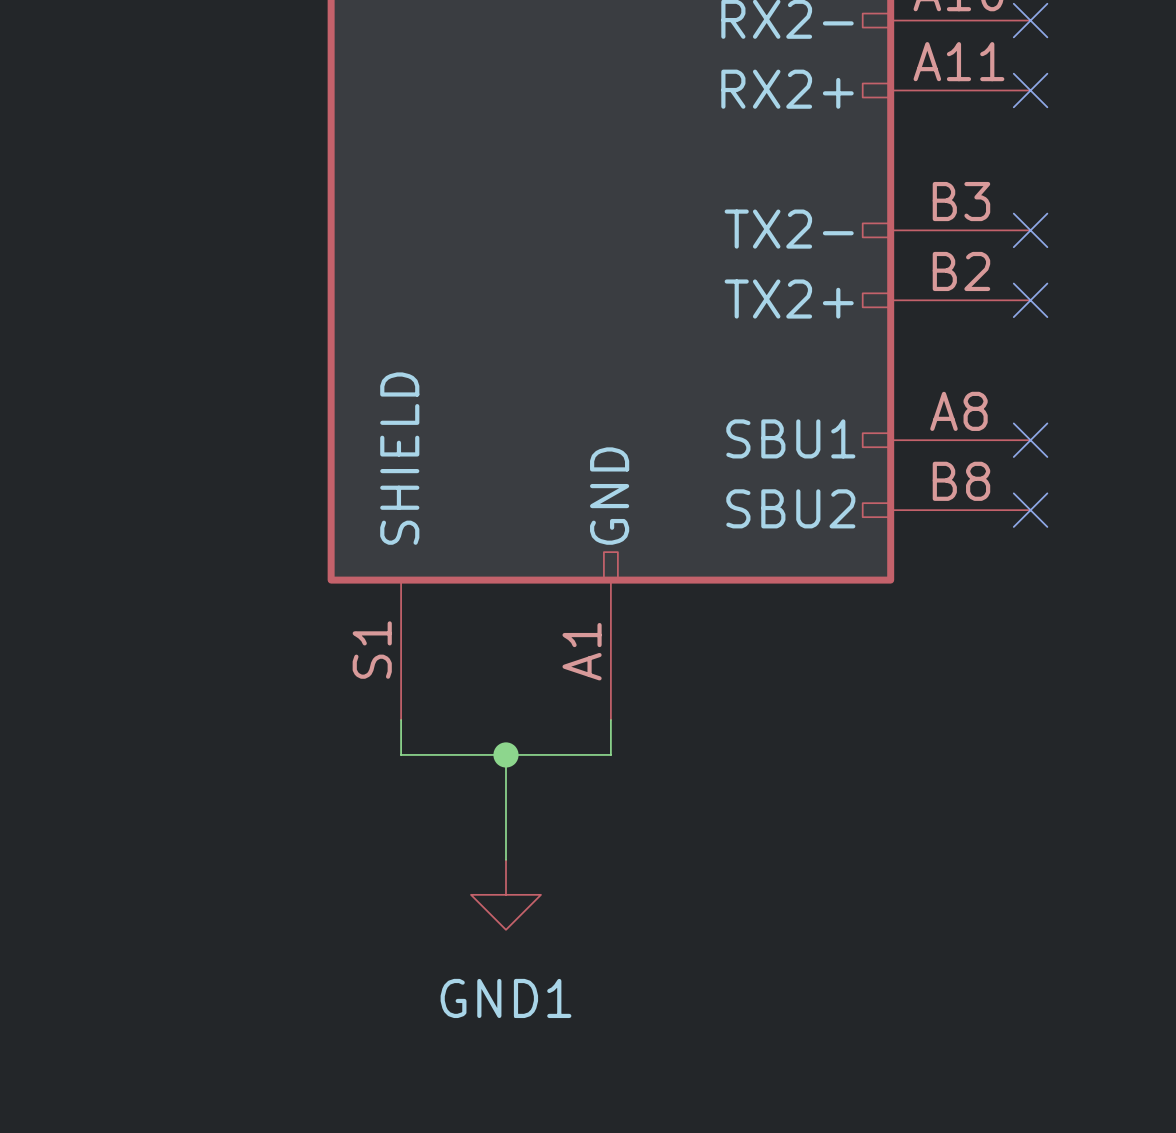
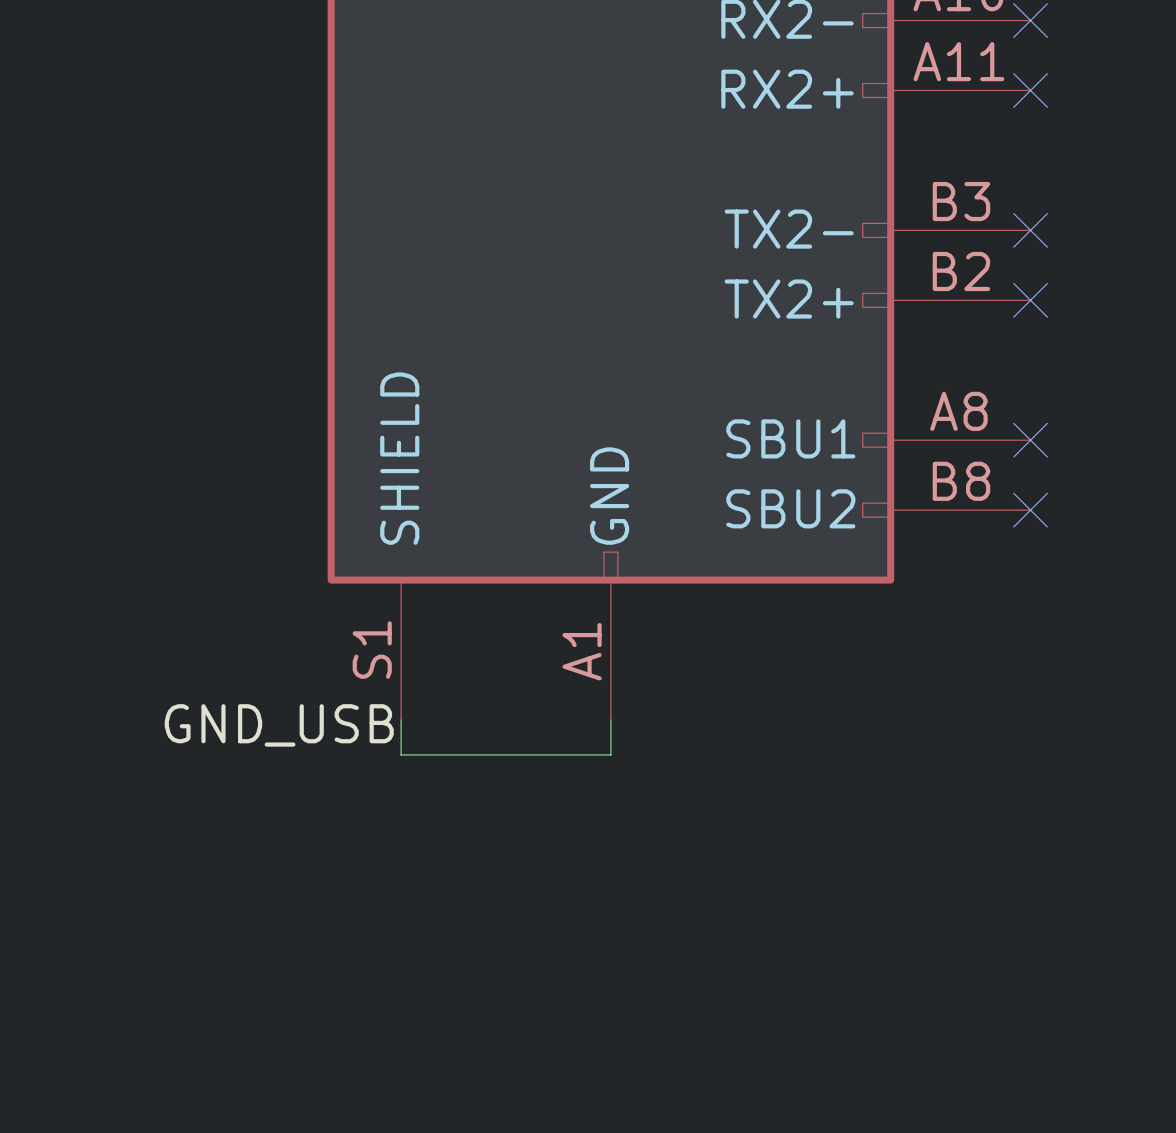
label: none -> GND_USB (279, 725)
wire: (505, 754) (505, 859) -> none
junction: (505, 754) -> none
power symbol: GND1 (505, 894) -> none

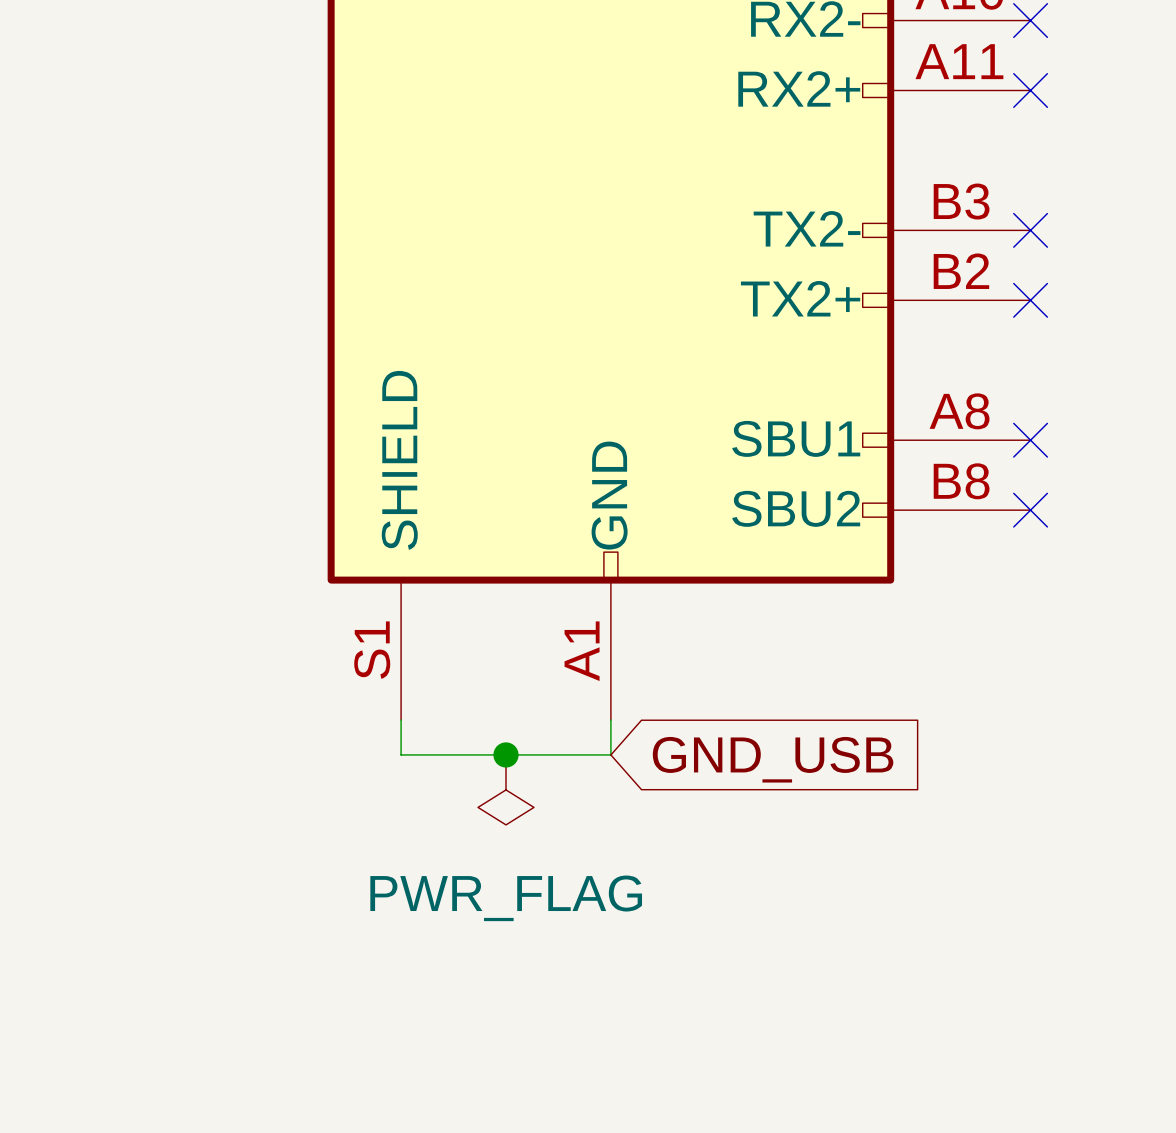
label: GND_USB (279, 725) -> none
junction: none -> (505, 754)
global label: none -> GND_USB (773, 759)
power symbol: none -> PWR_FLAG (505, 789)

